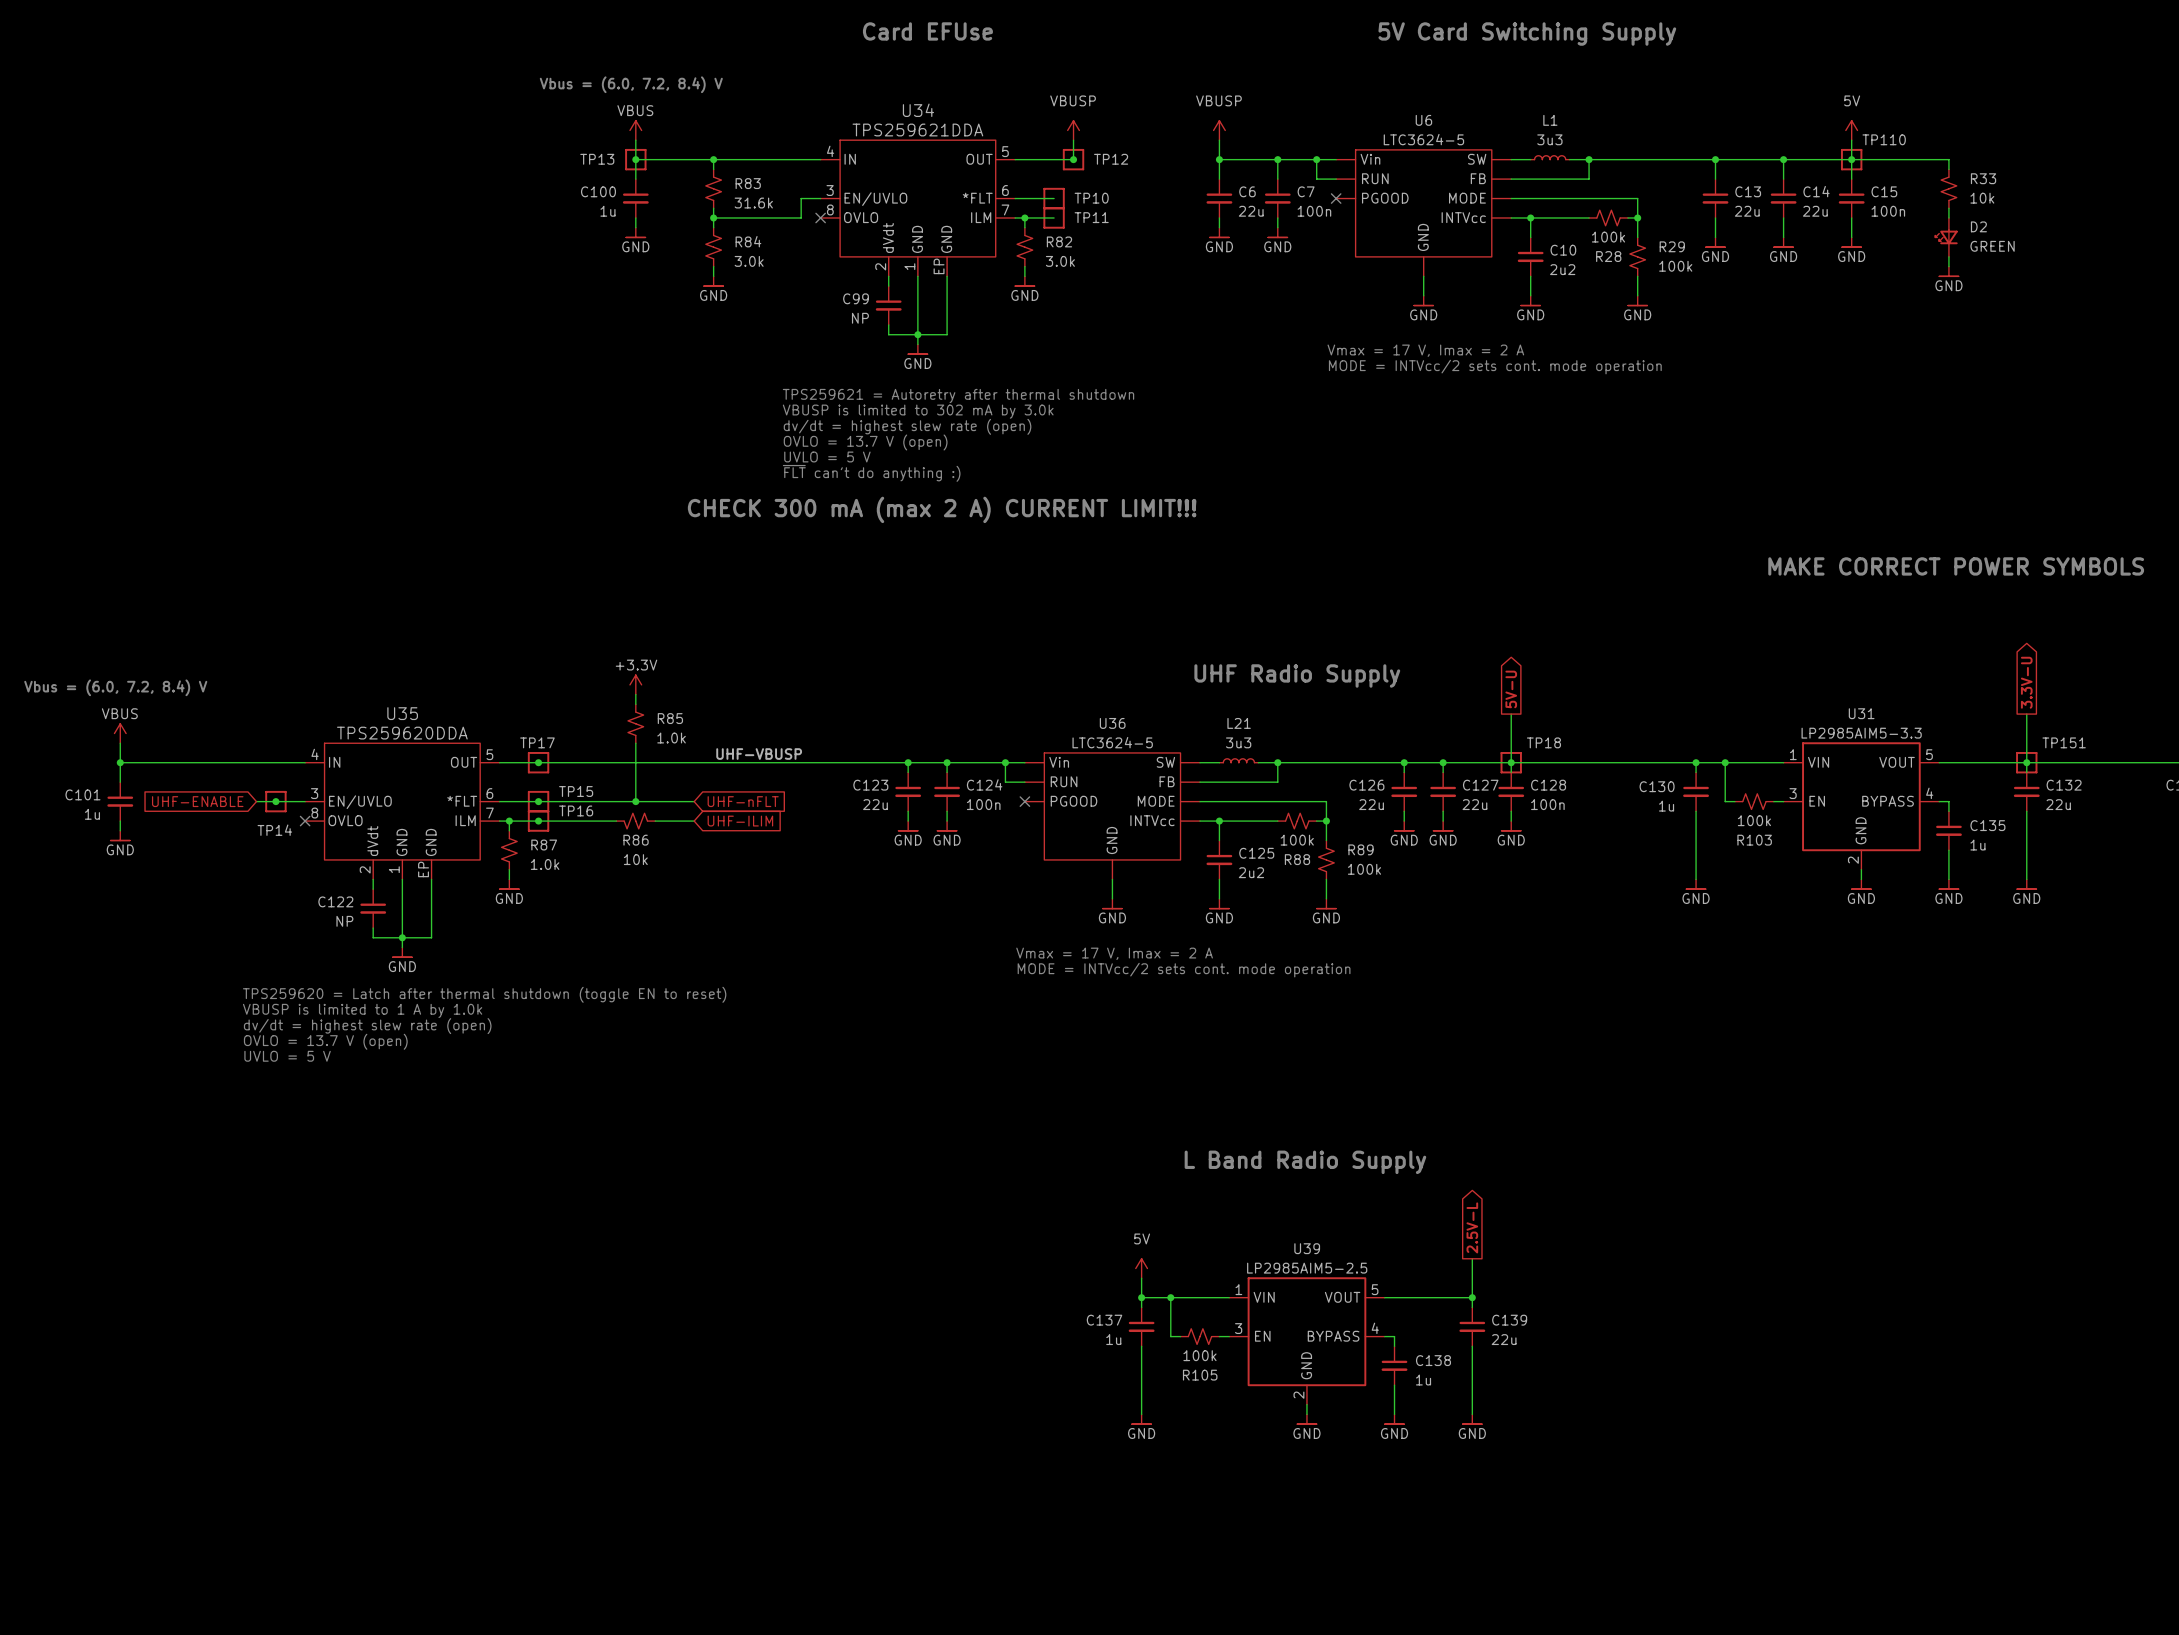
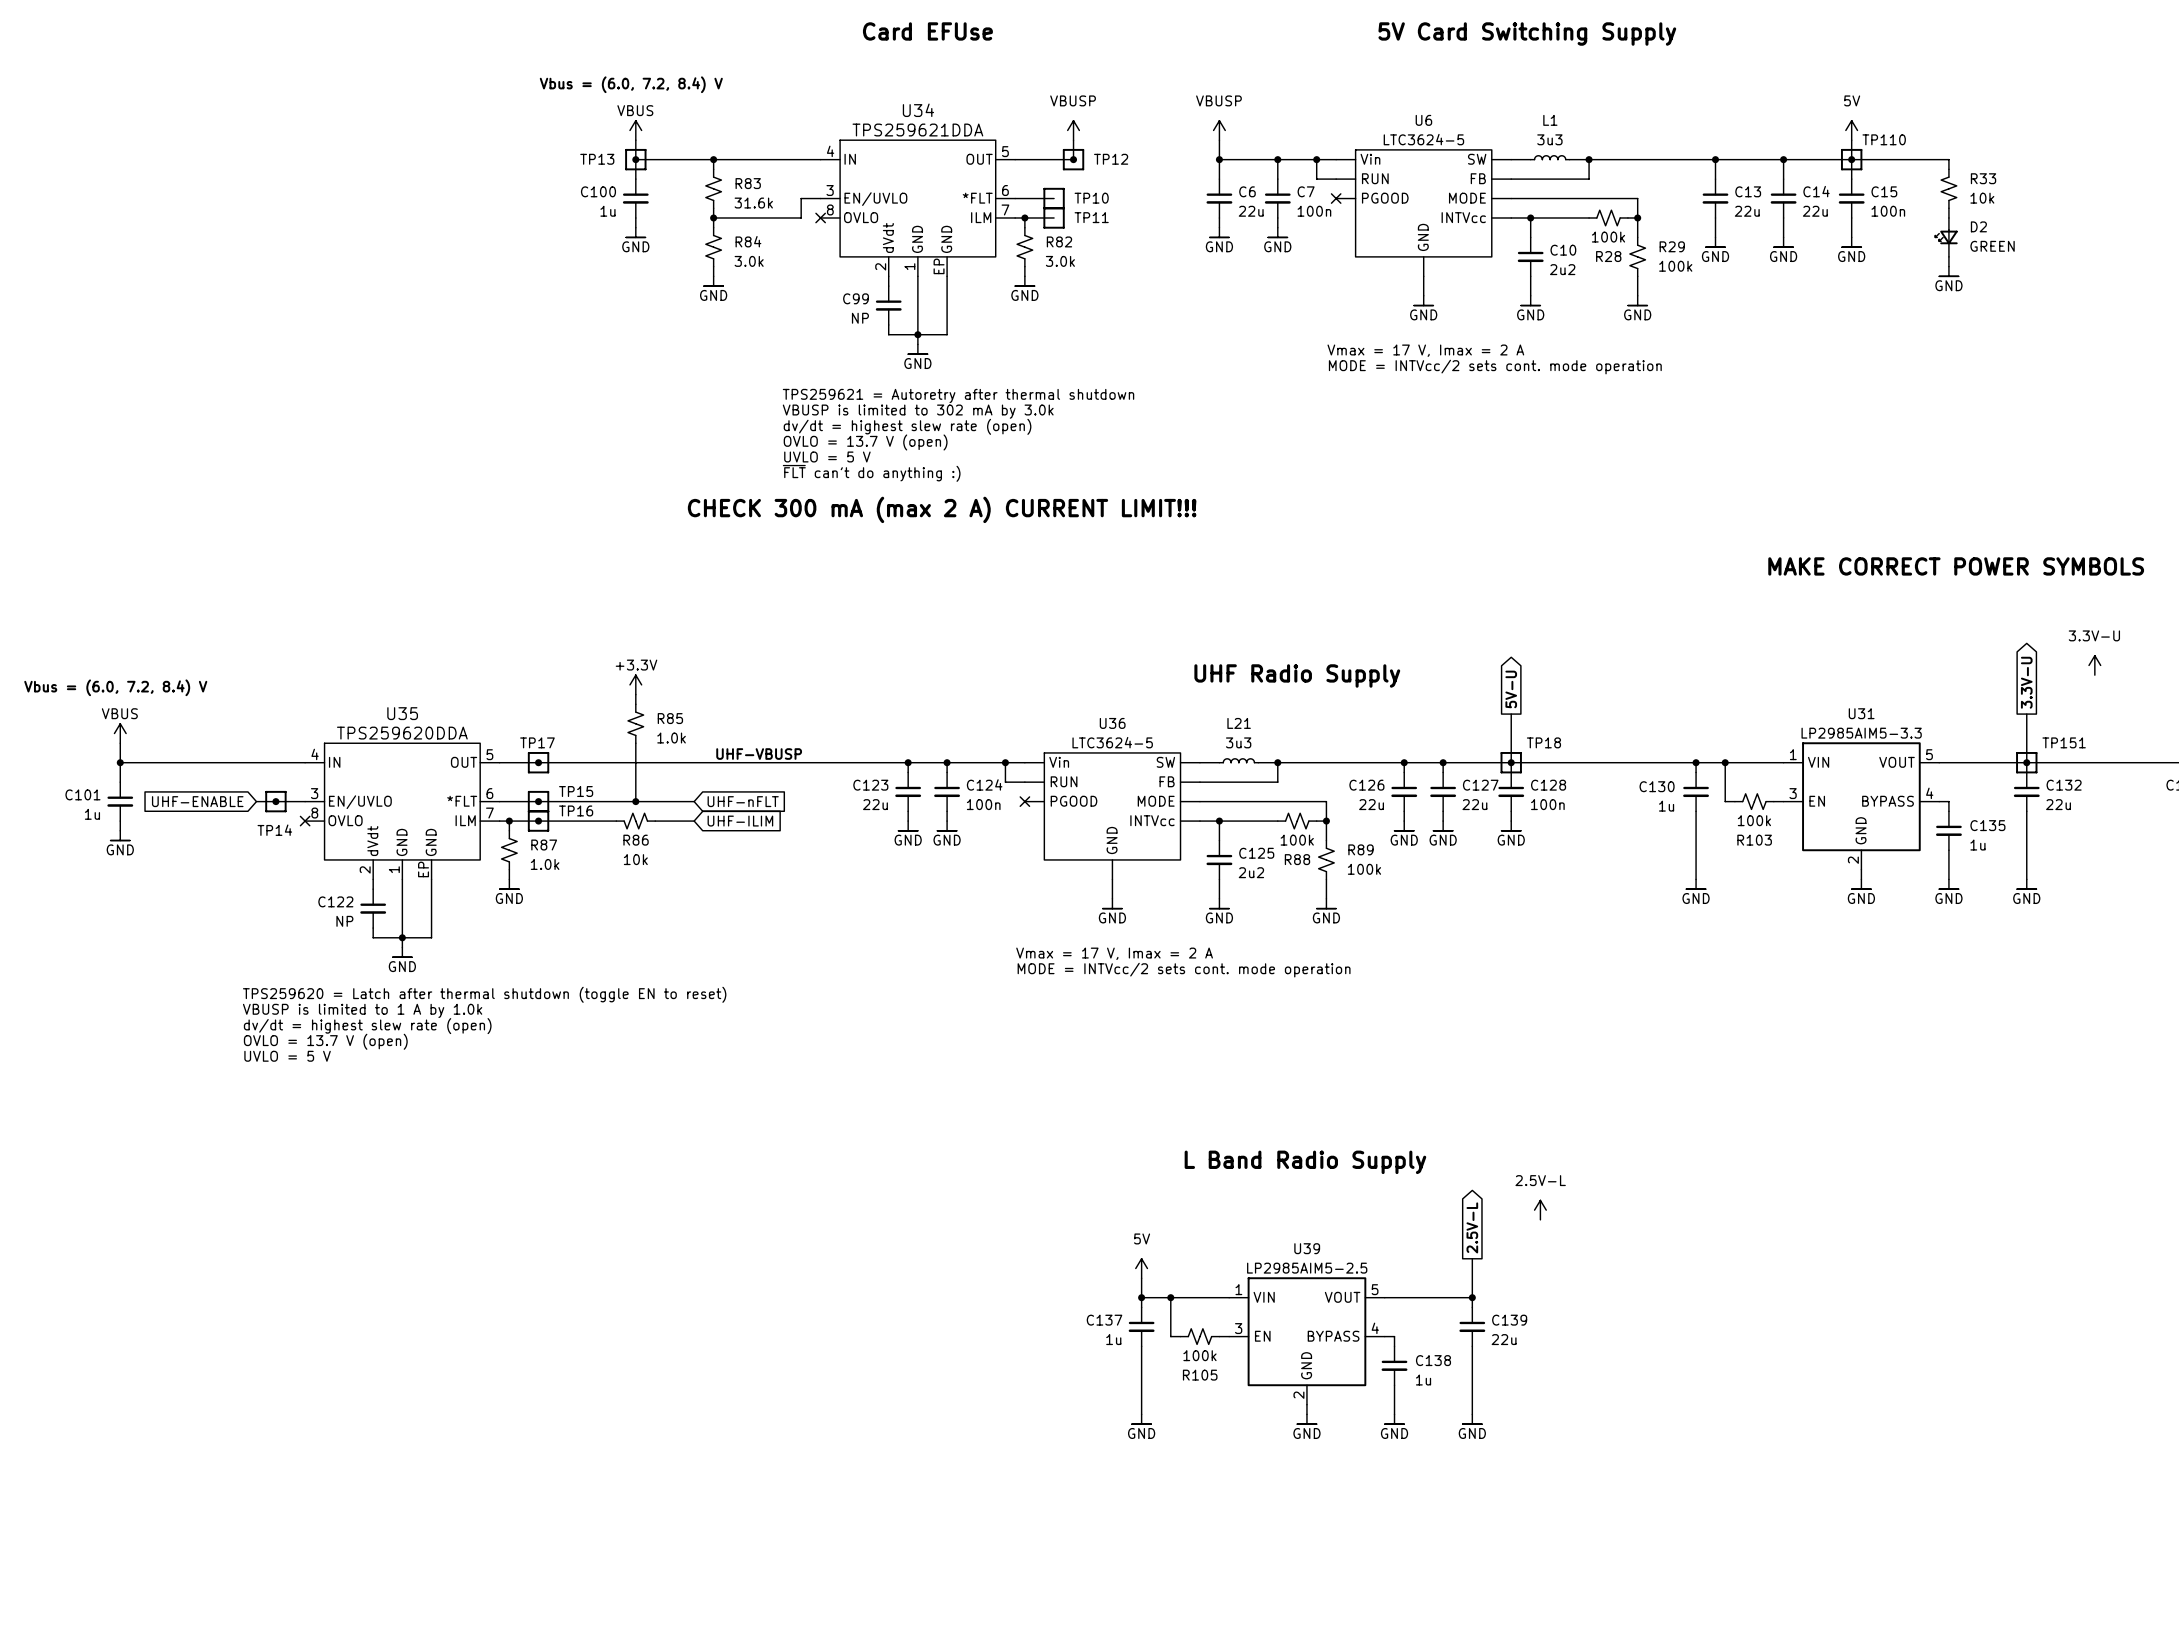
power symbol: none -> 3.3V-U (2094, 665)
power symbol: none -> 2.5V-L (1540, 1210)

